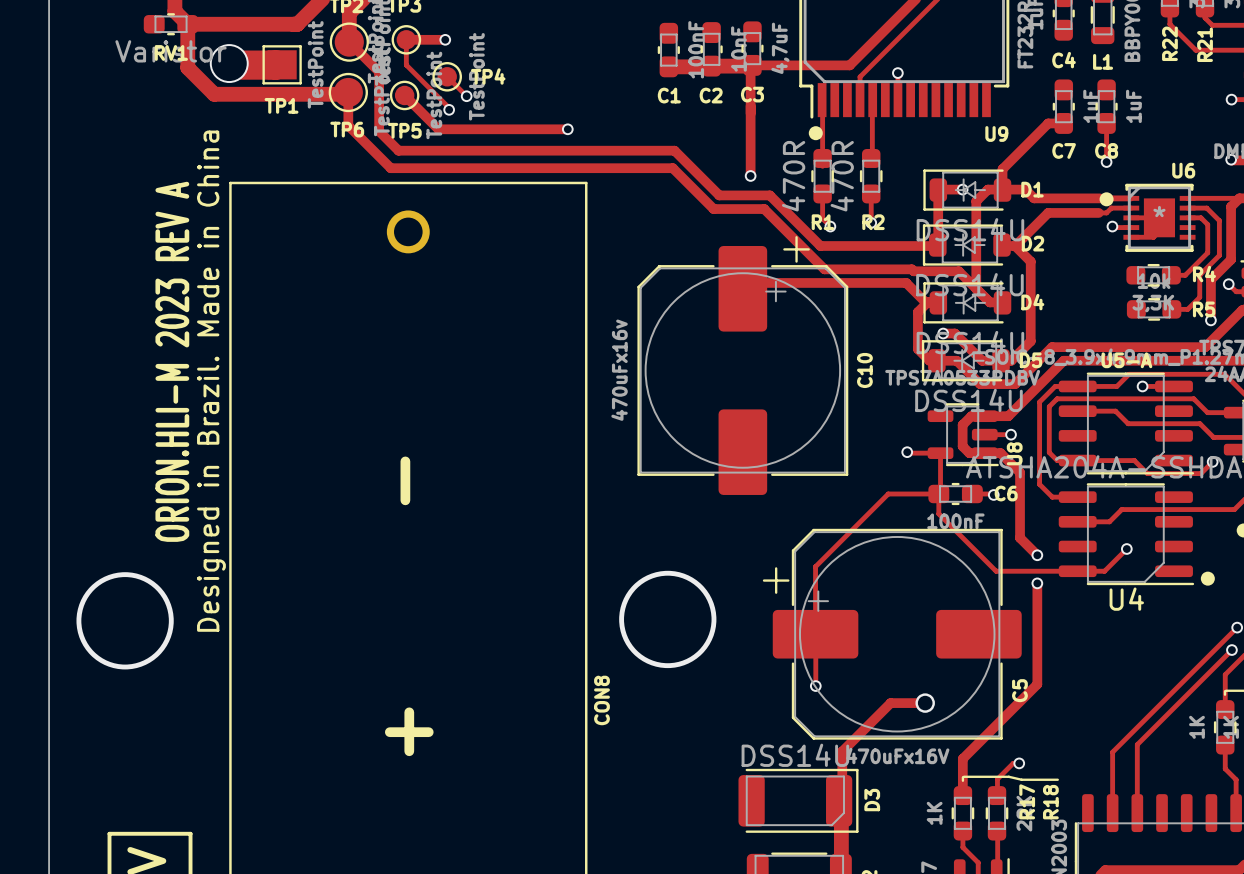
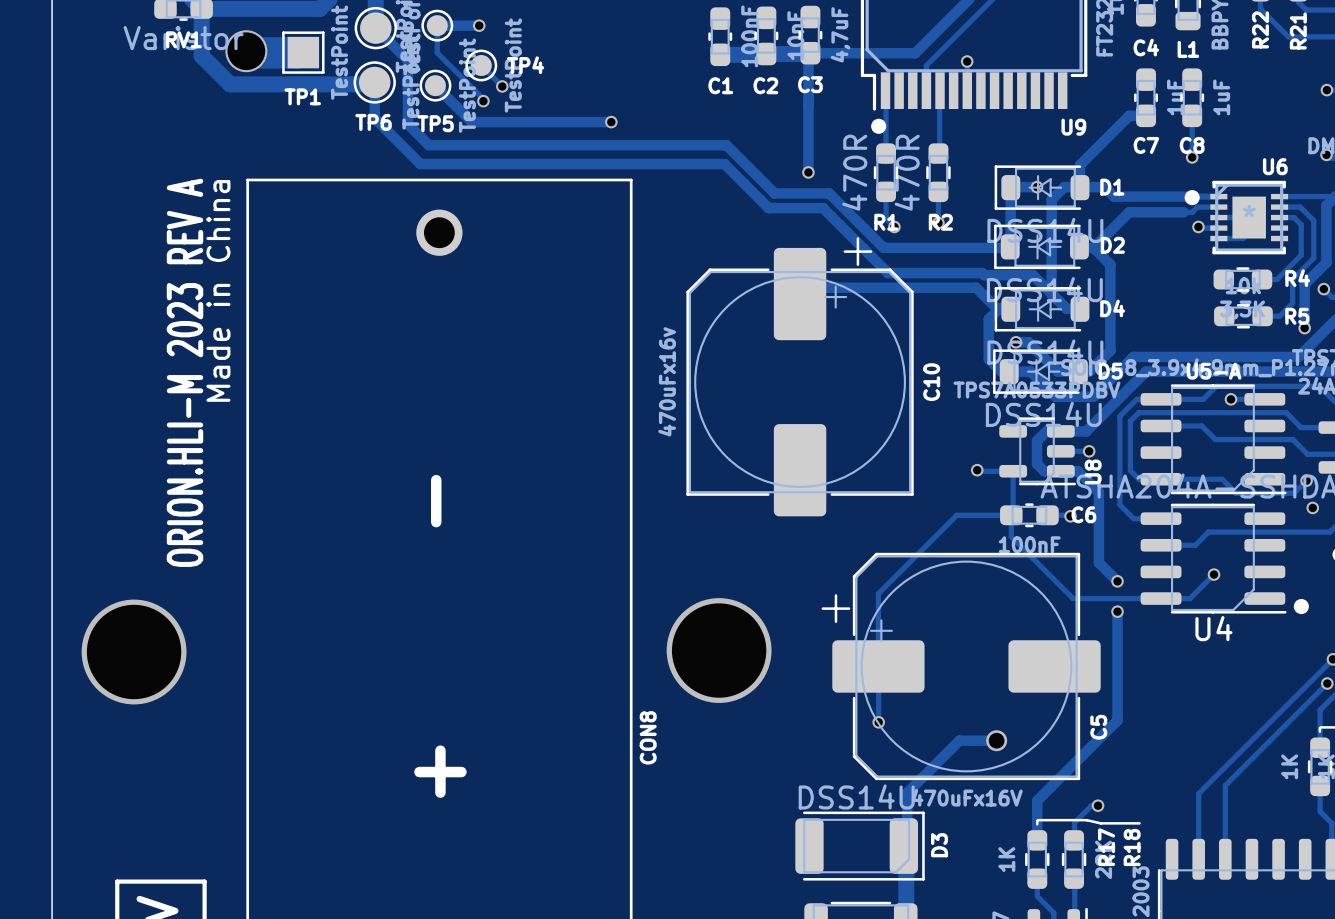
text: none -> Made in China (218, 290)
text: Designed in Brazil. Made in China (211, 381) -> none
via: none -> (1312, 507)

